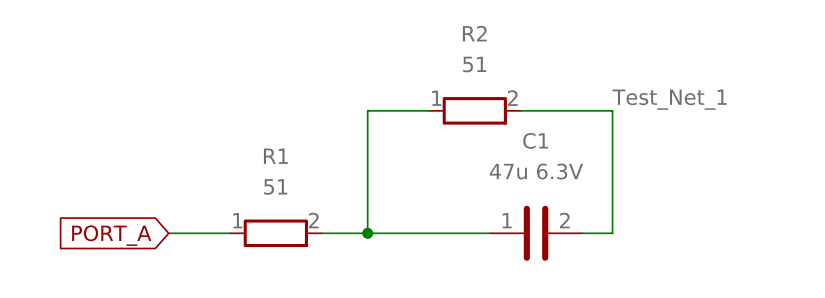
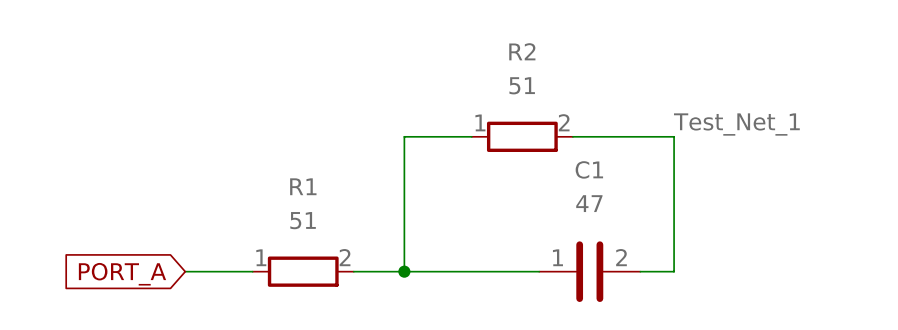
C1 value: 47u 6.3V (536, 171) -> 47 (589, 203)

